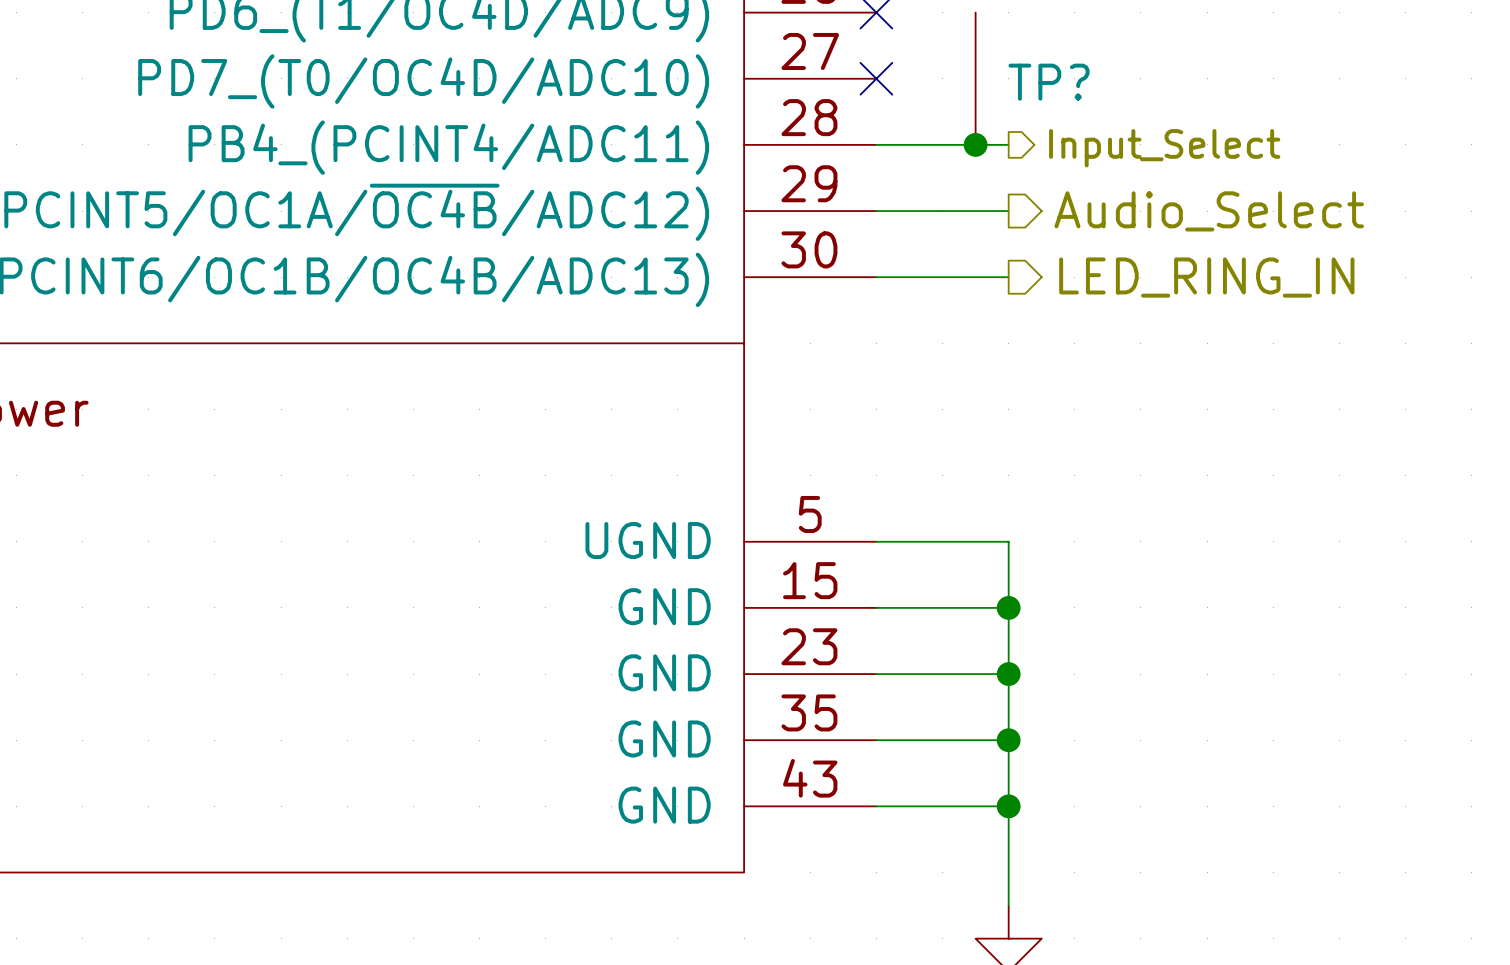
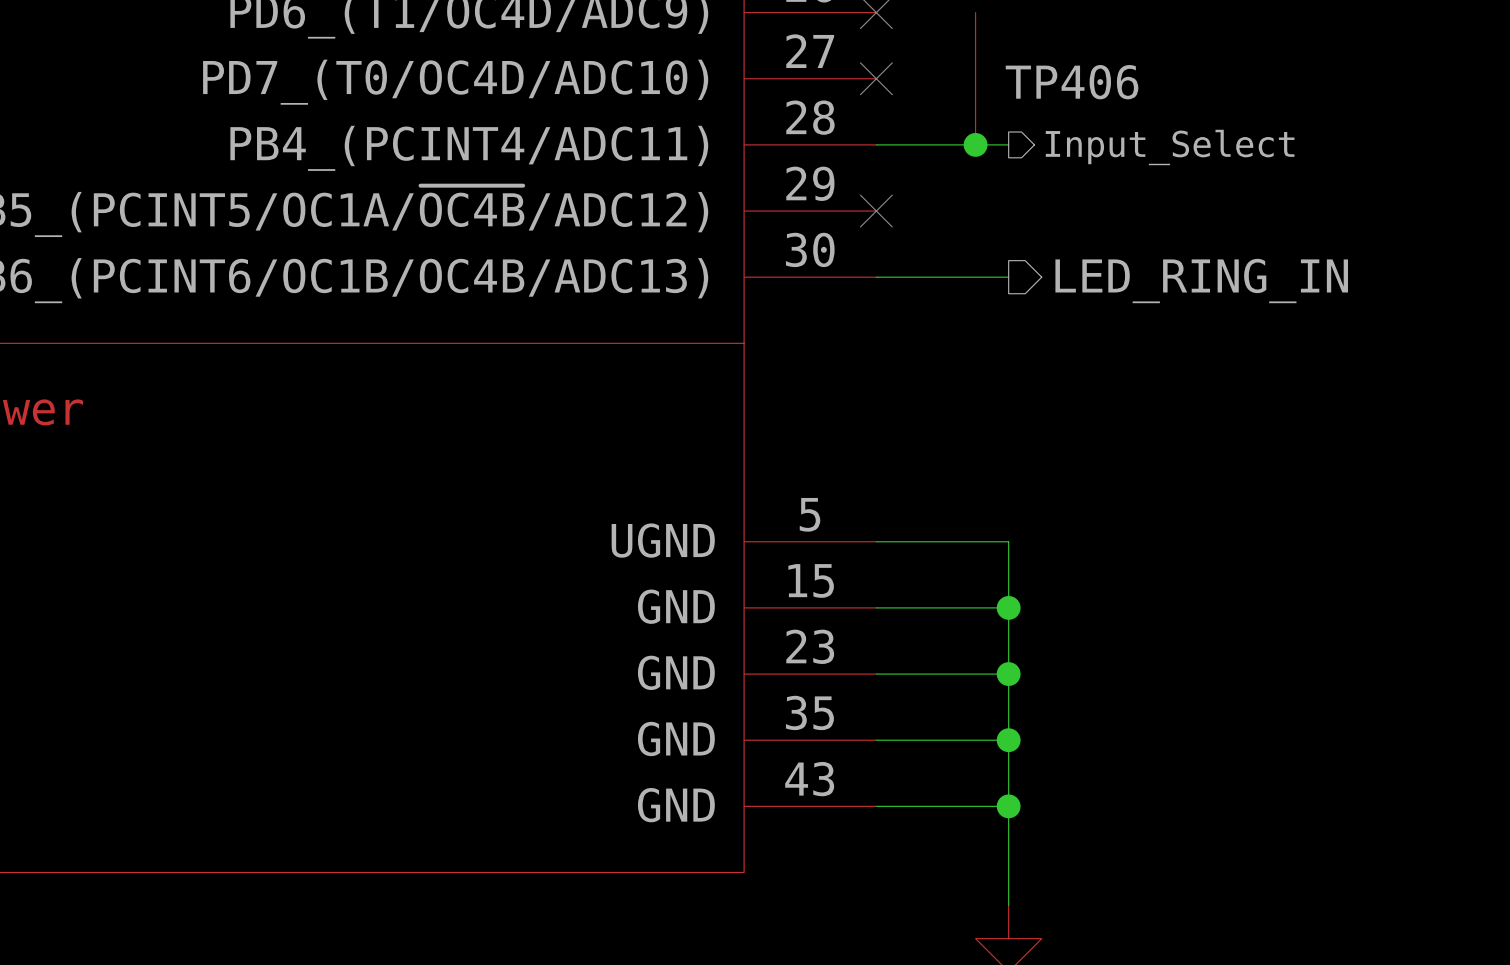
TP? name: TP? (1049, 82) -> TP406 (1072, 82)
wire: (876, 211) (1008, 211) -> none
no-connect mark: none -> (876, 211)
hierarchical label: Audio_Select (1209, 211) -> none

